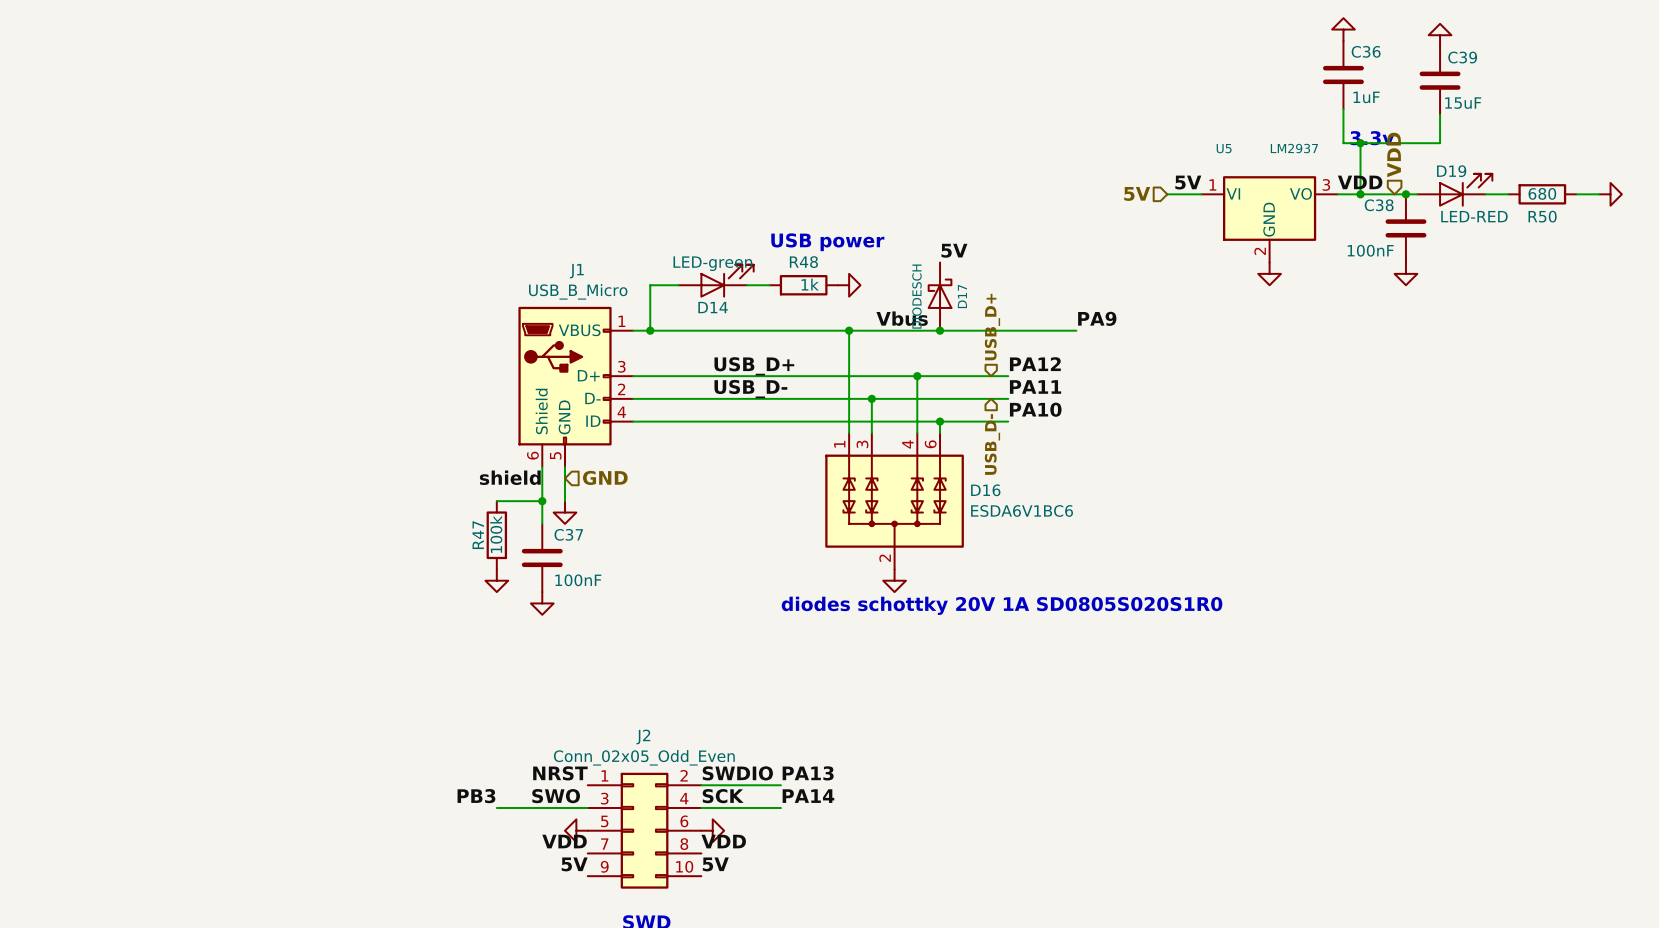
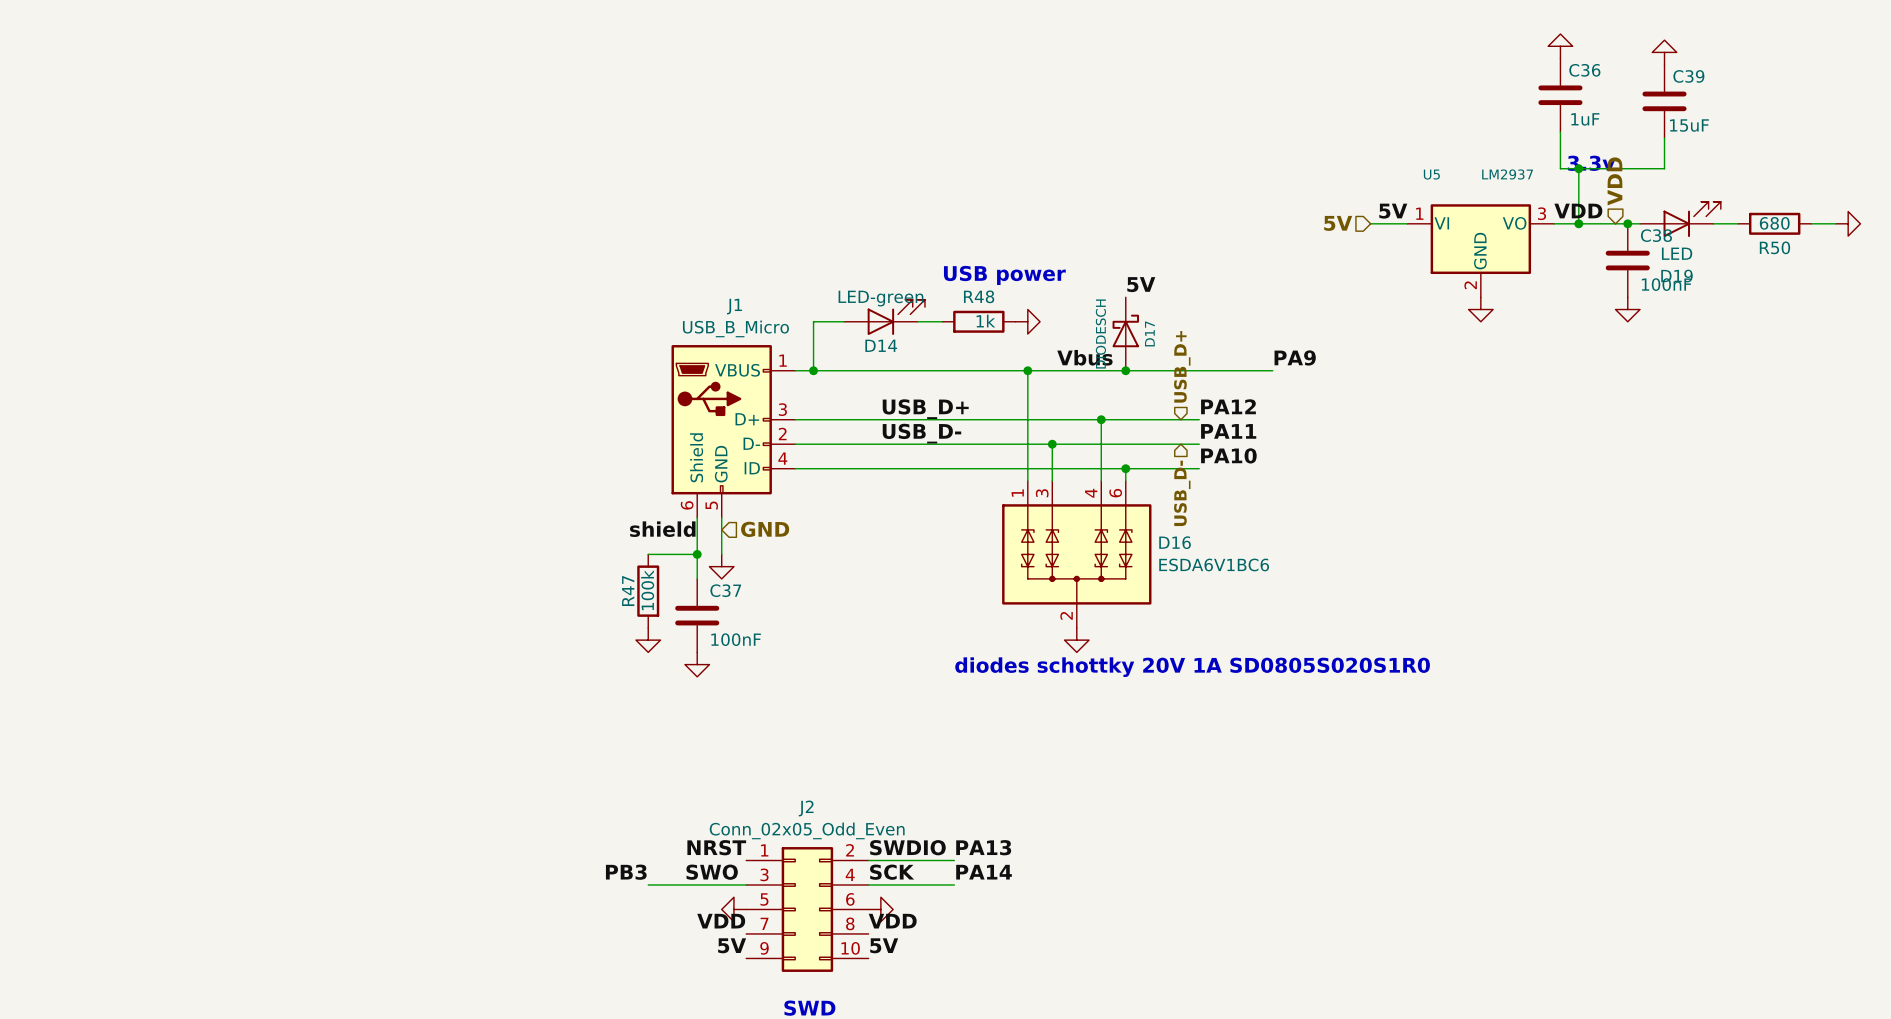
D19 name position: D19 (1451, 171) -> D19 (1676, 276)
C38 name position: C38 (1379, 205) -> C38 (1656, 235)
D19 value: LED-RED (1474, 216) -> LED (1677, 253)
C38 value position: 100nF (1370, 250) -> 100nF (1666, 284)

